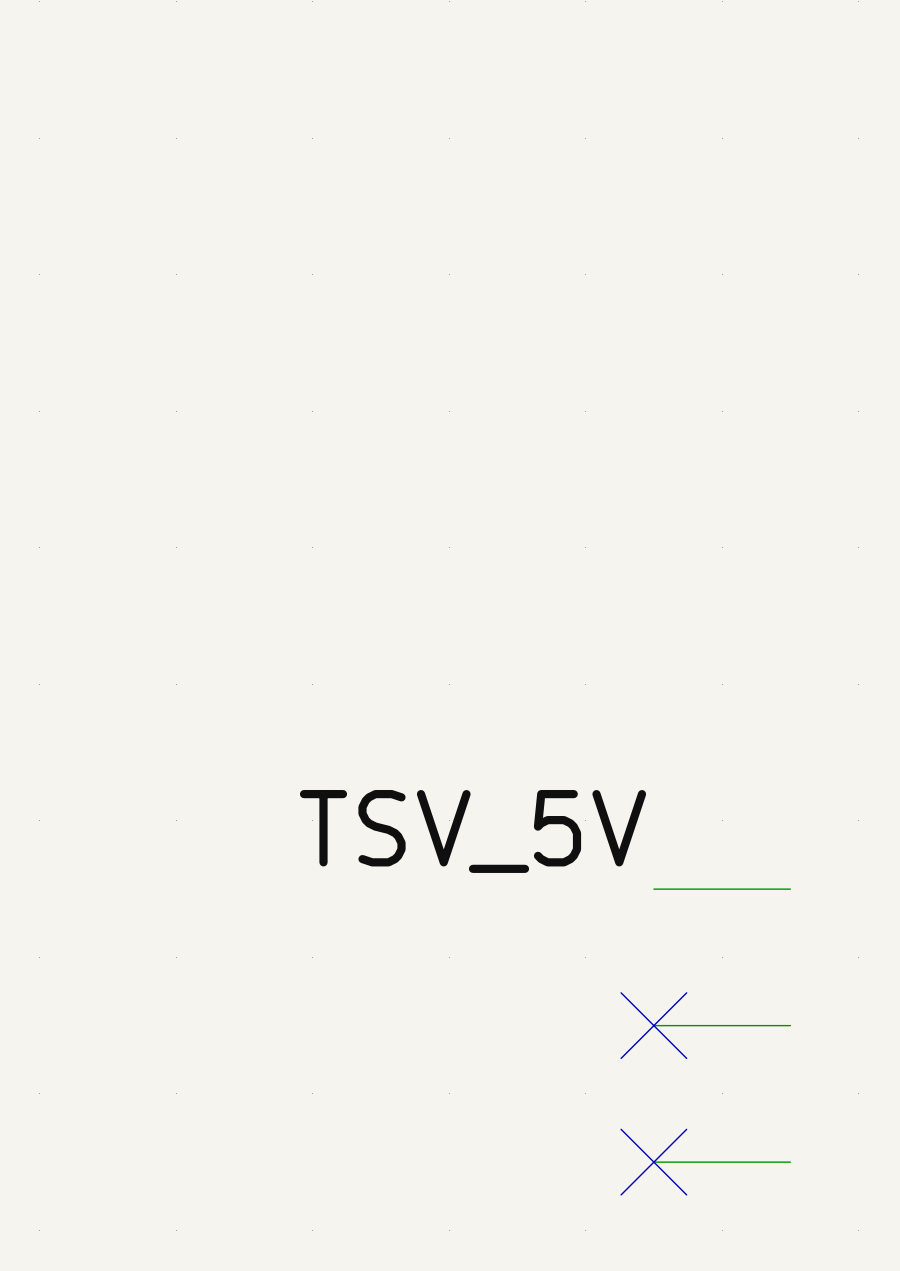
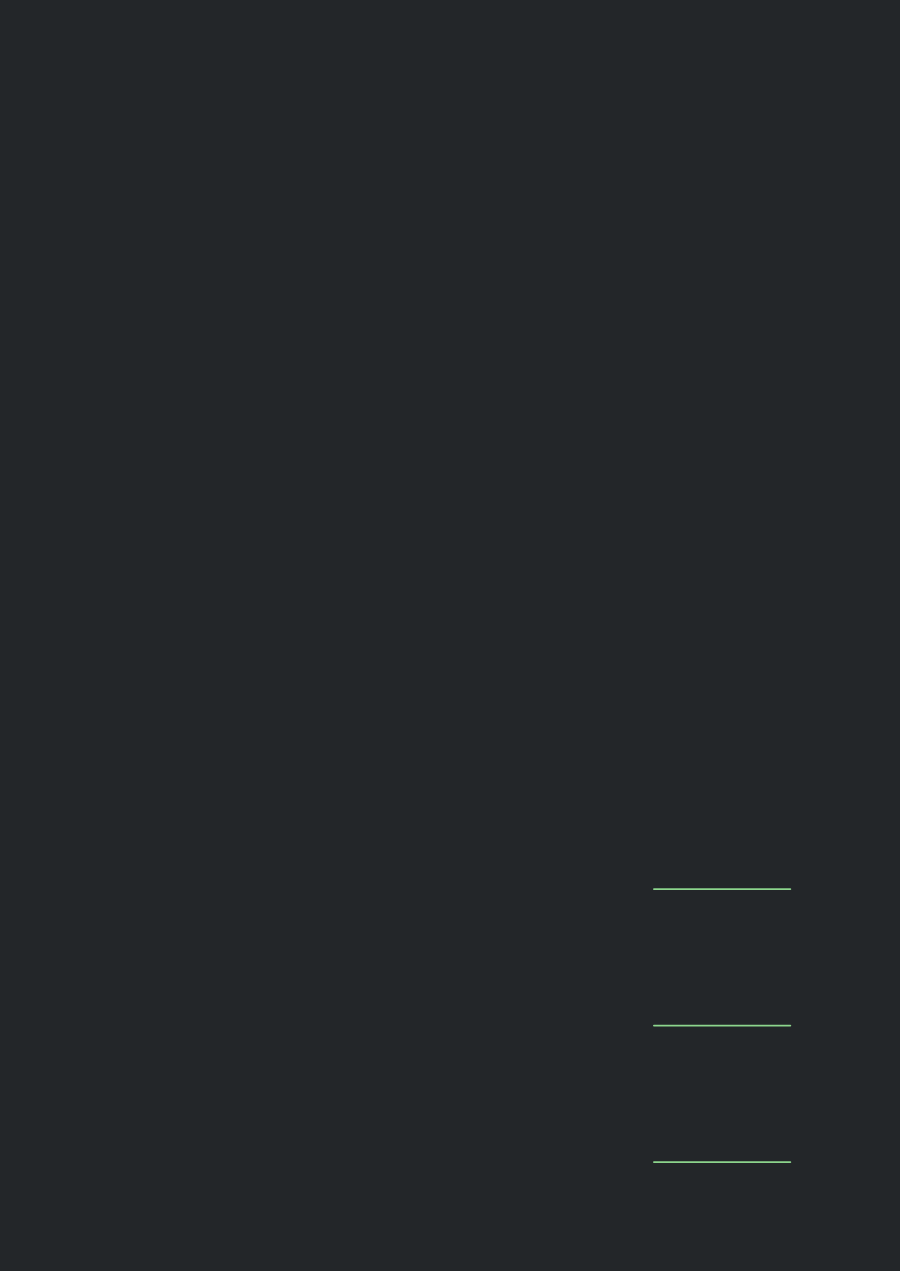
label: TSV_5V (473, 831) -> none
no-connect mark: (653, 1025) -> none
no-connect mark: (653, 1162) -> none

